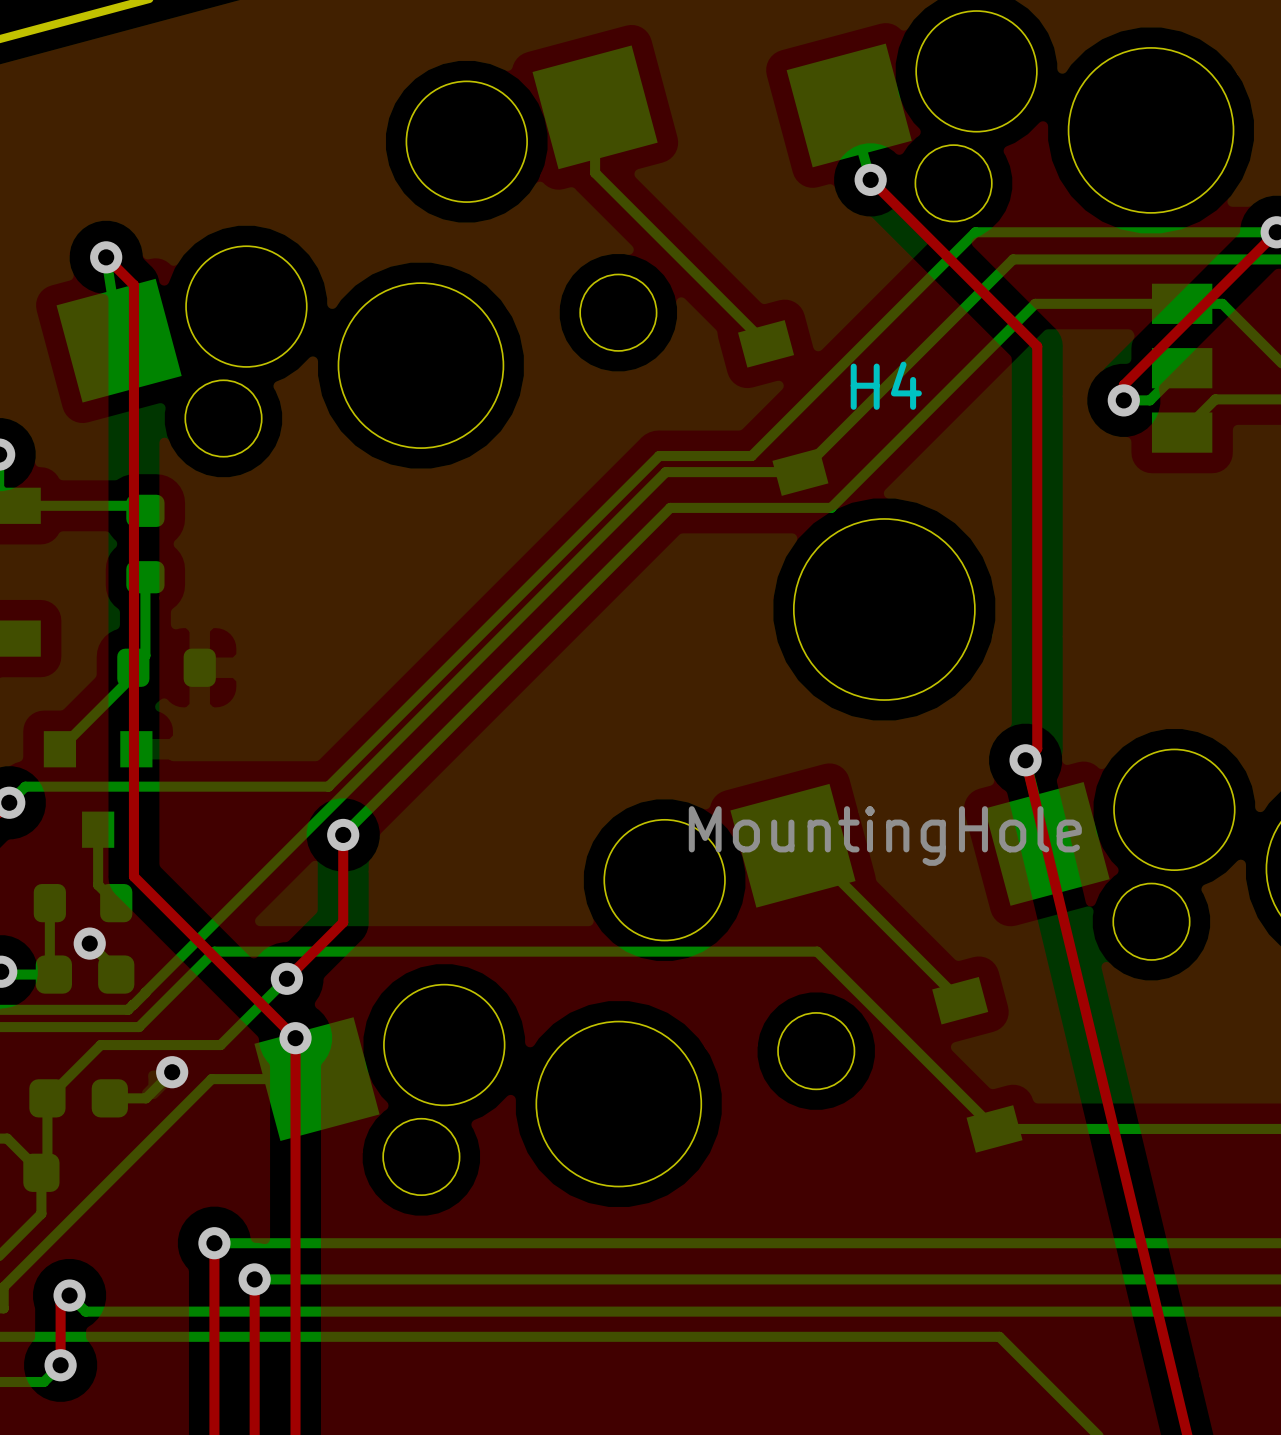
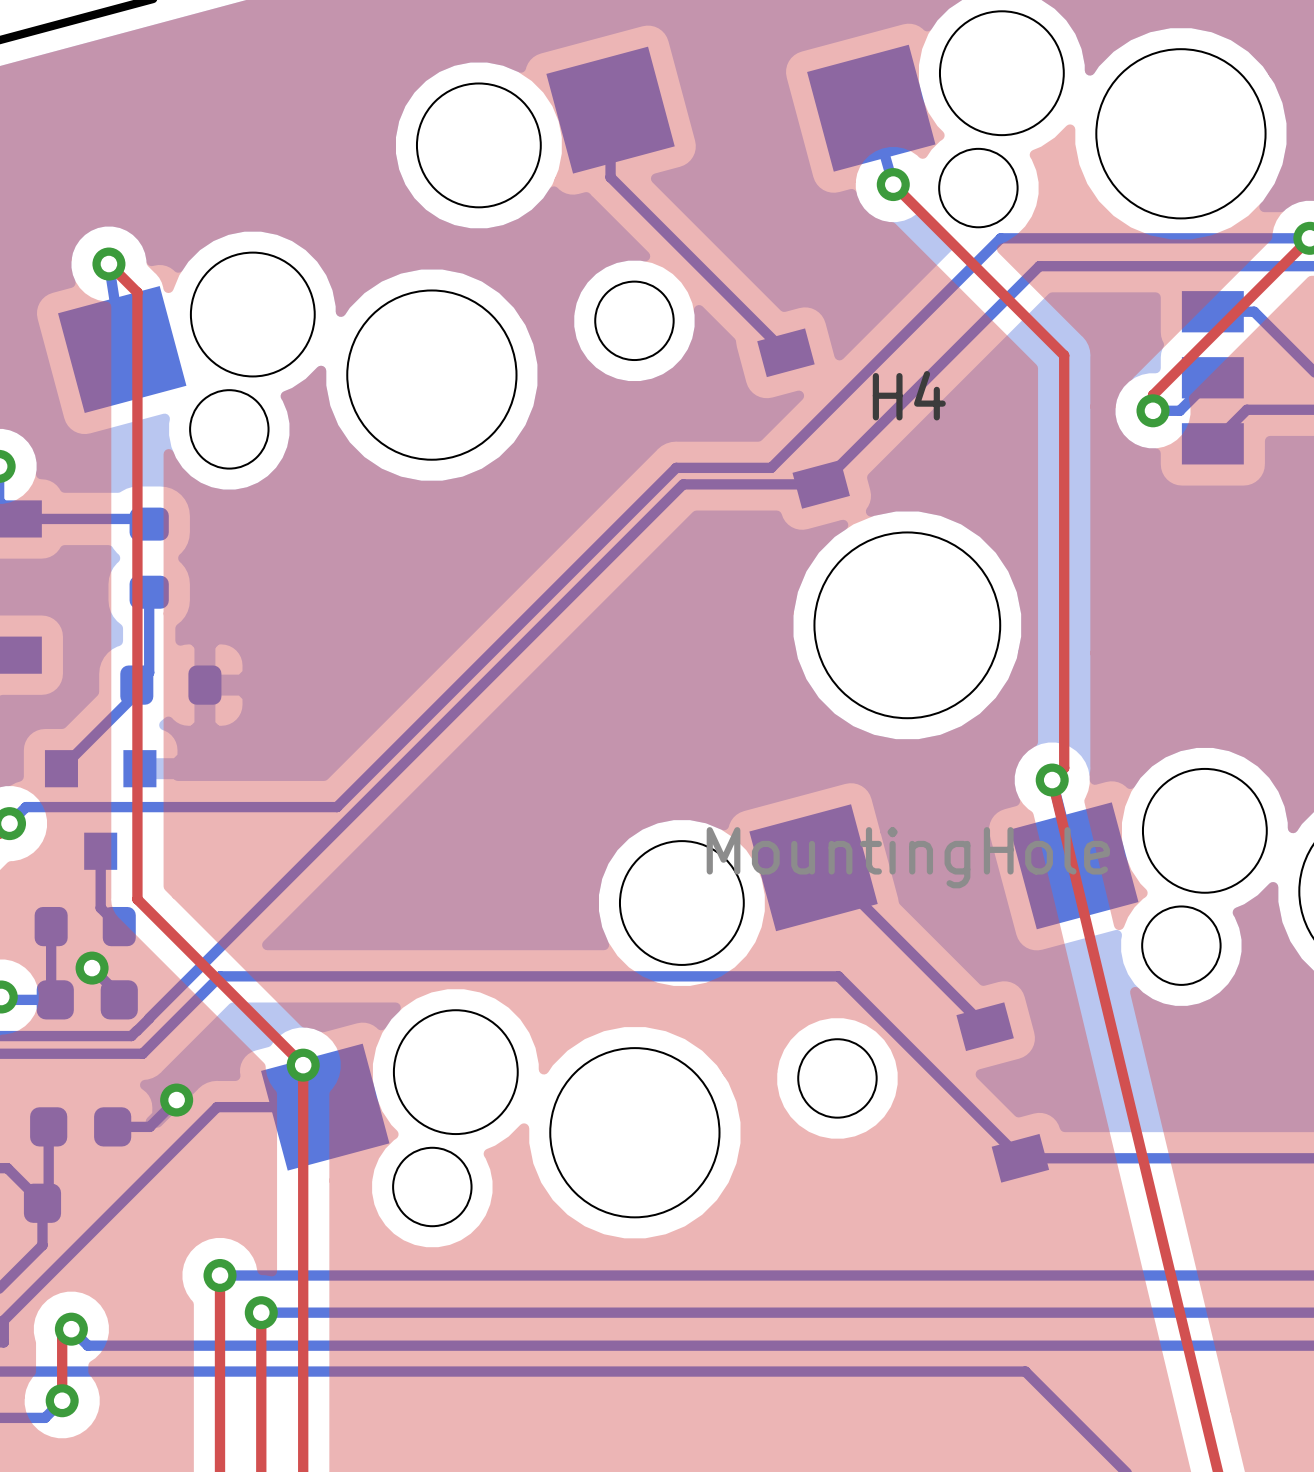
bottom track: (1182, 303) (1035, 303) (831, 507) (670, 507) (343, 834) -> none
top track: (343, 834) (343, 922) (286, 978) -> none
via: (343, 834) -> none
bottom track: (286, 978) (220, 1045) (100, 1045) (47, 1098) -> none
via: (286, 978) -> none

